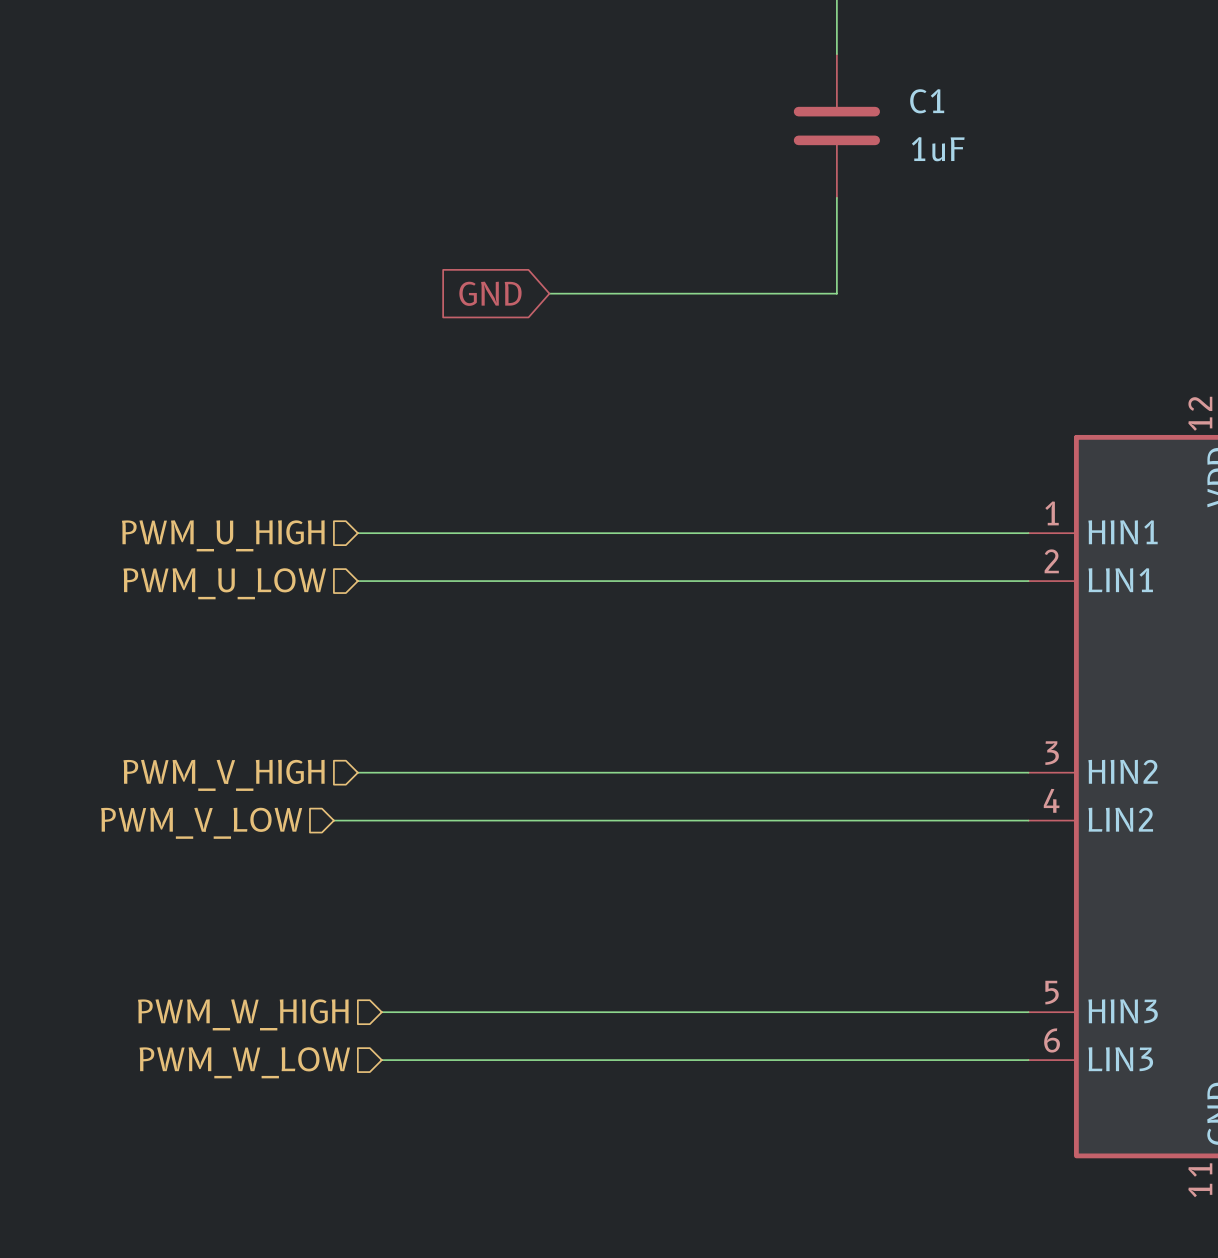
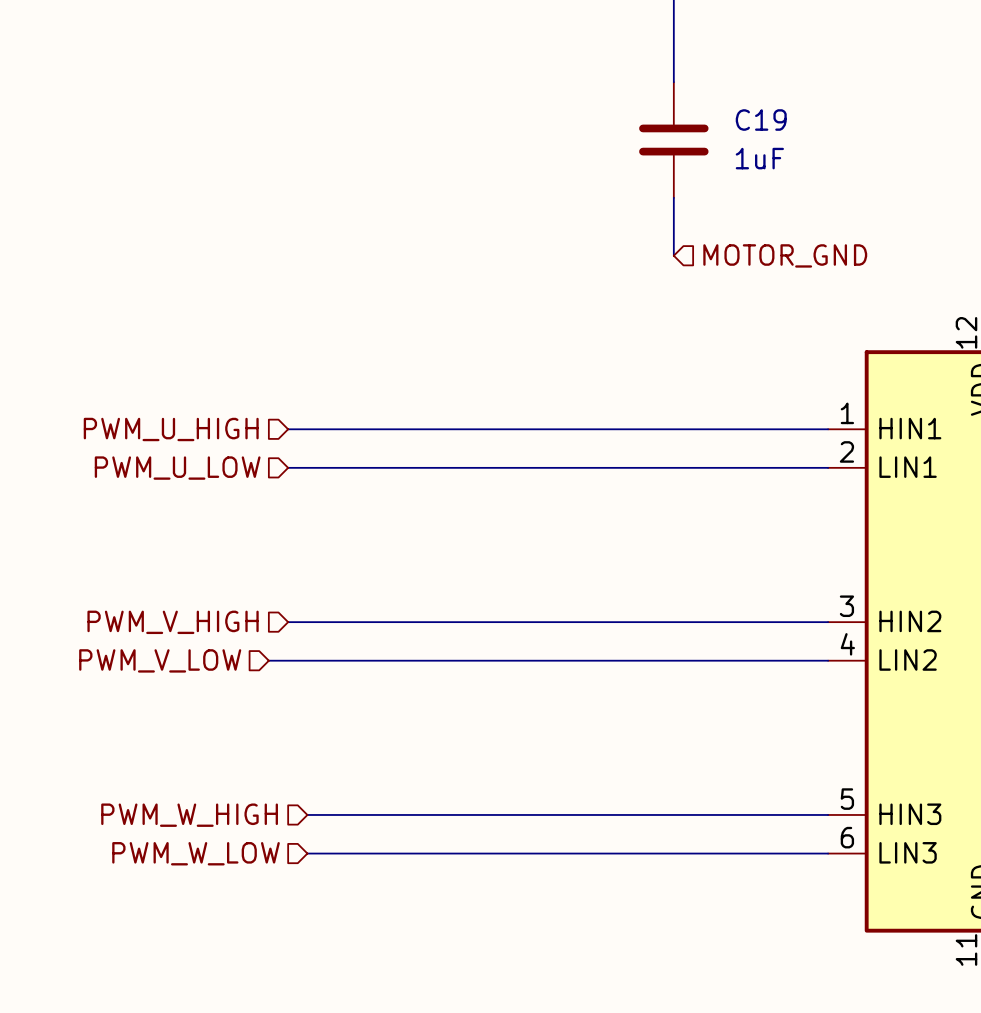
C1: 1uF (836, 126) -> none
C19: none -> 1uF (673, 140)
global label: GND (490, 293) -> none
wire: (549, 293) (836, 293) -> (673, 255) (673, 236)
hierarchical label: none -> MOTOR_GND (785, 255)

